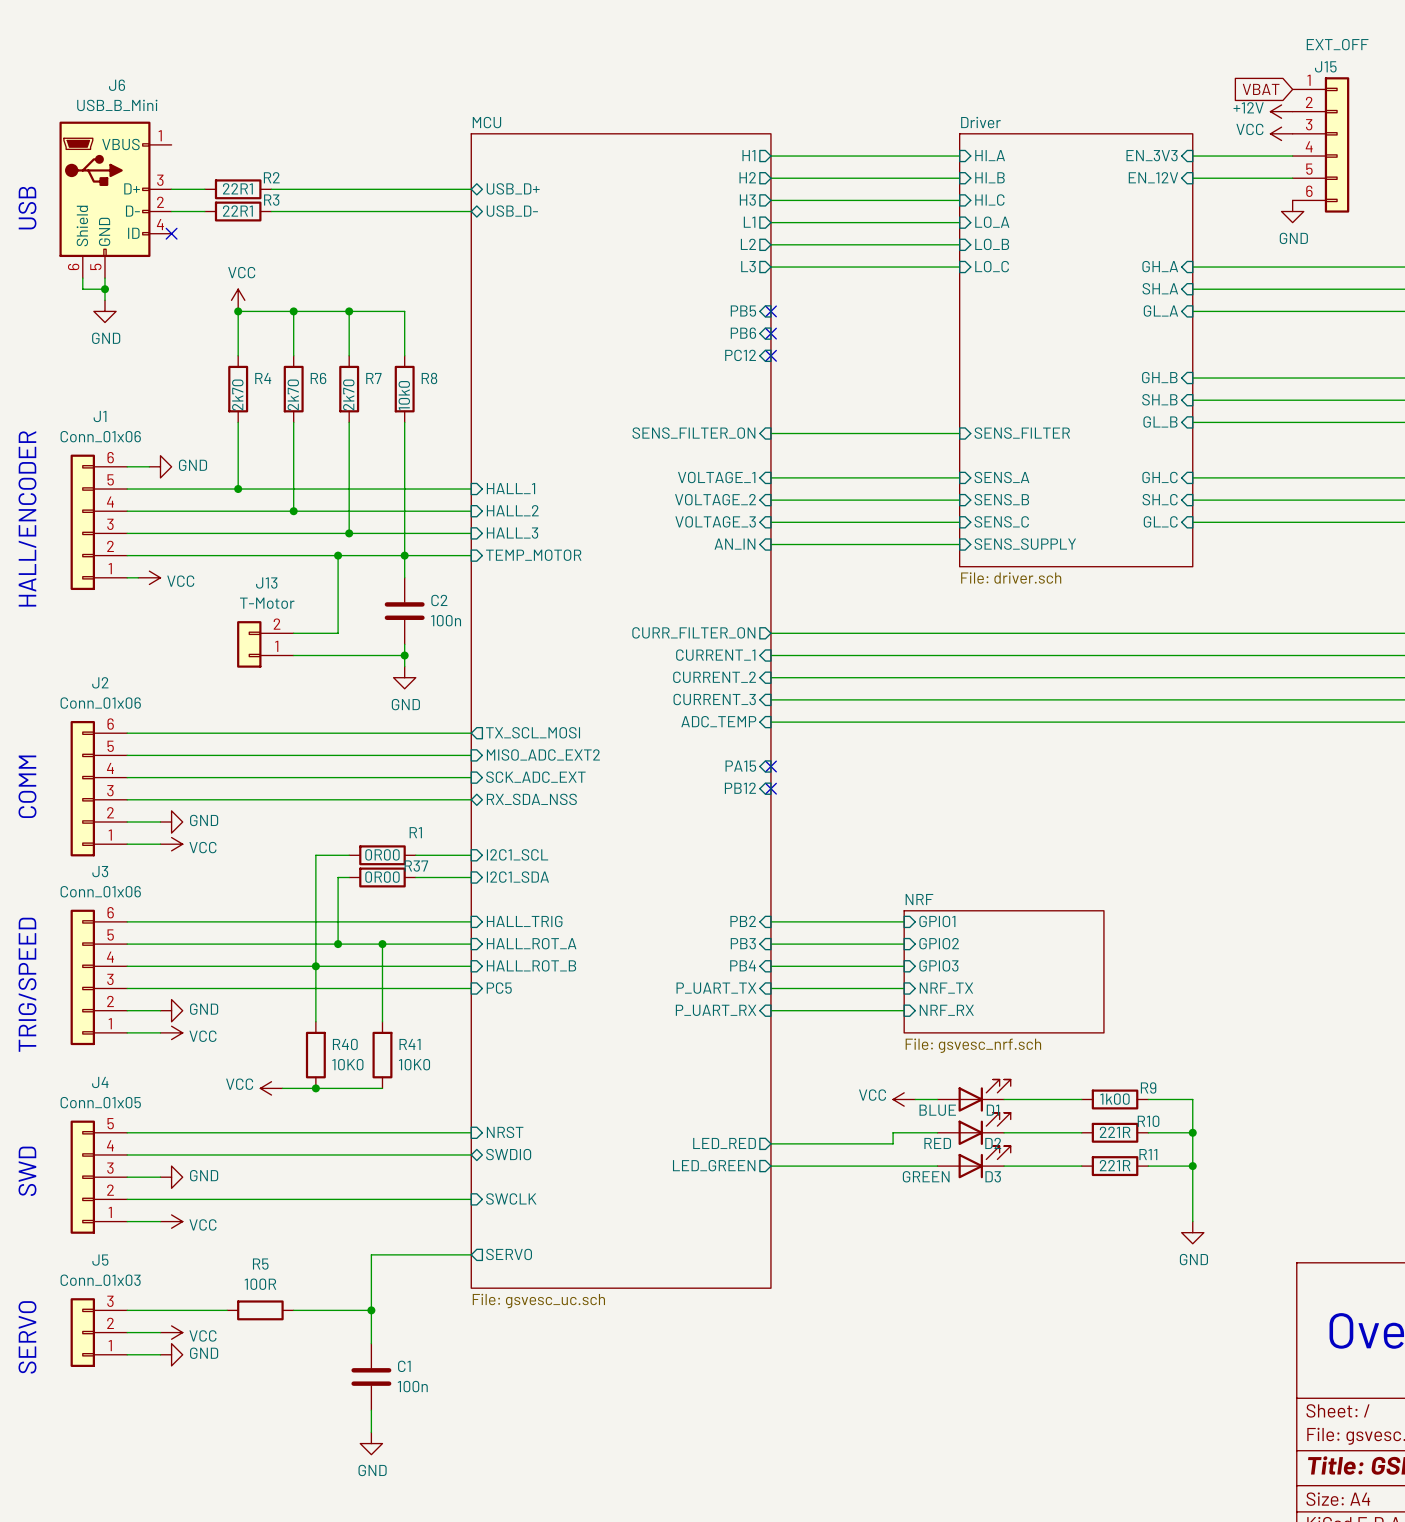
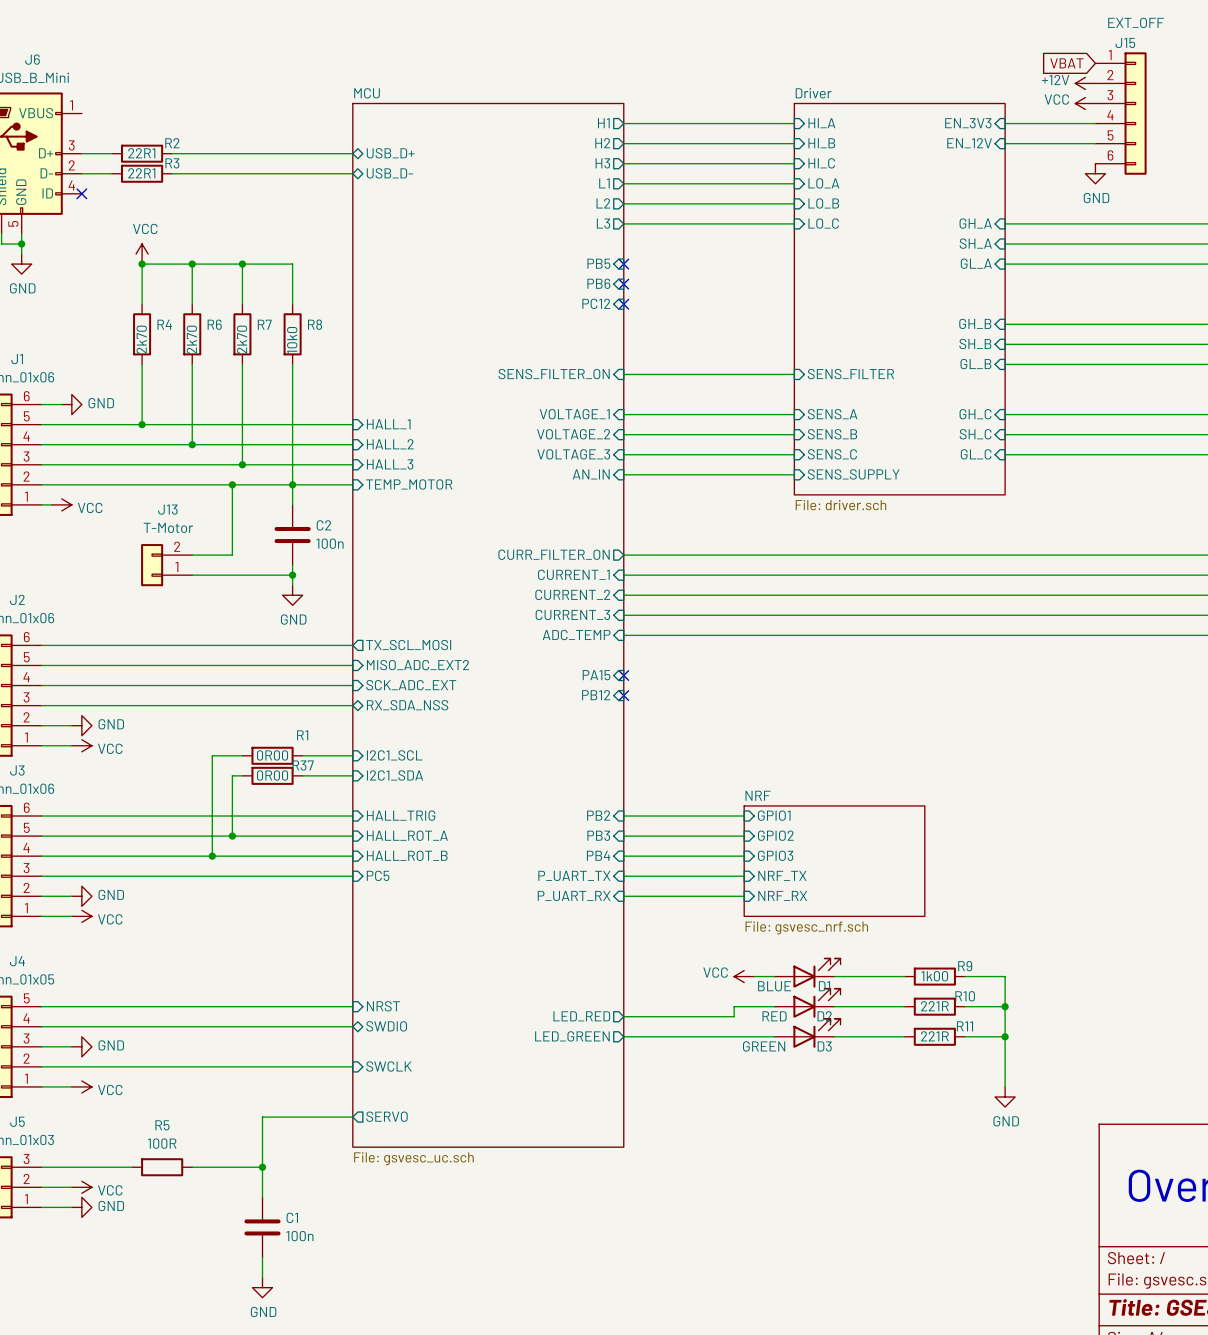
wire: (382, 944) (382, 1021) -> none
junction: (382, 944) -> none
wire: (315, 966) (315, 1021) -> none
R40: 10K0 (315, 1055) -> none
R41: 10K0 (382, 1055) -> none
power symbol: VCC (271, 1088) -> none
wire: (282, 1088) (382, 1088) -> none
junction: (315, 1088) -> none

